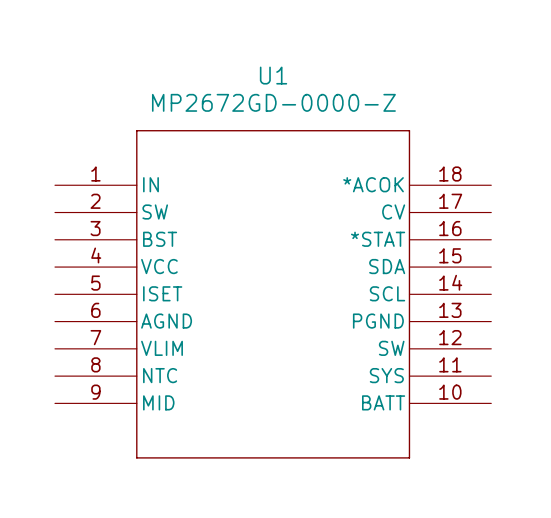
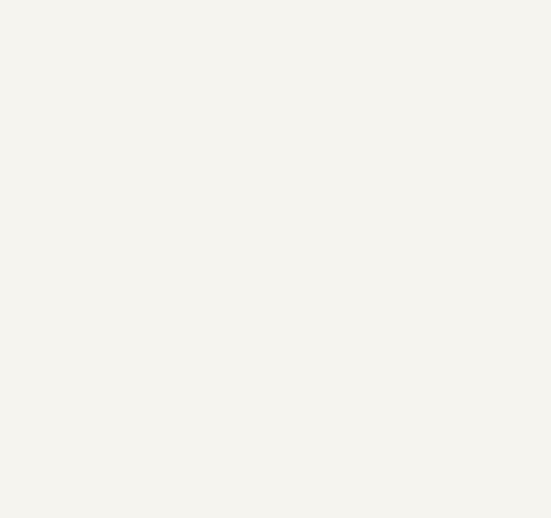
U1: MP2672GD-0000-Z (273, 294) -> none

